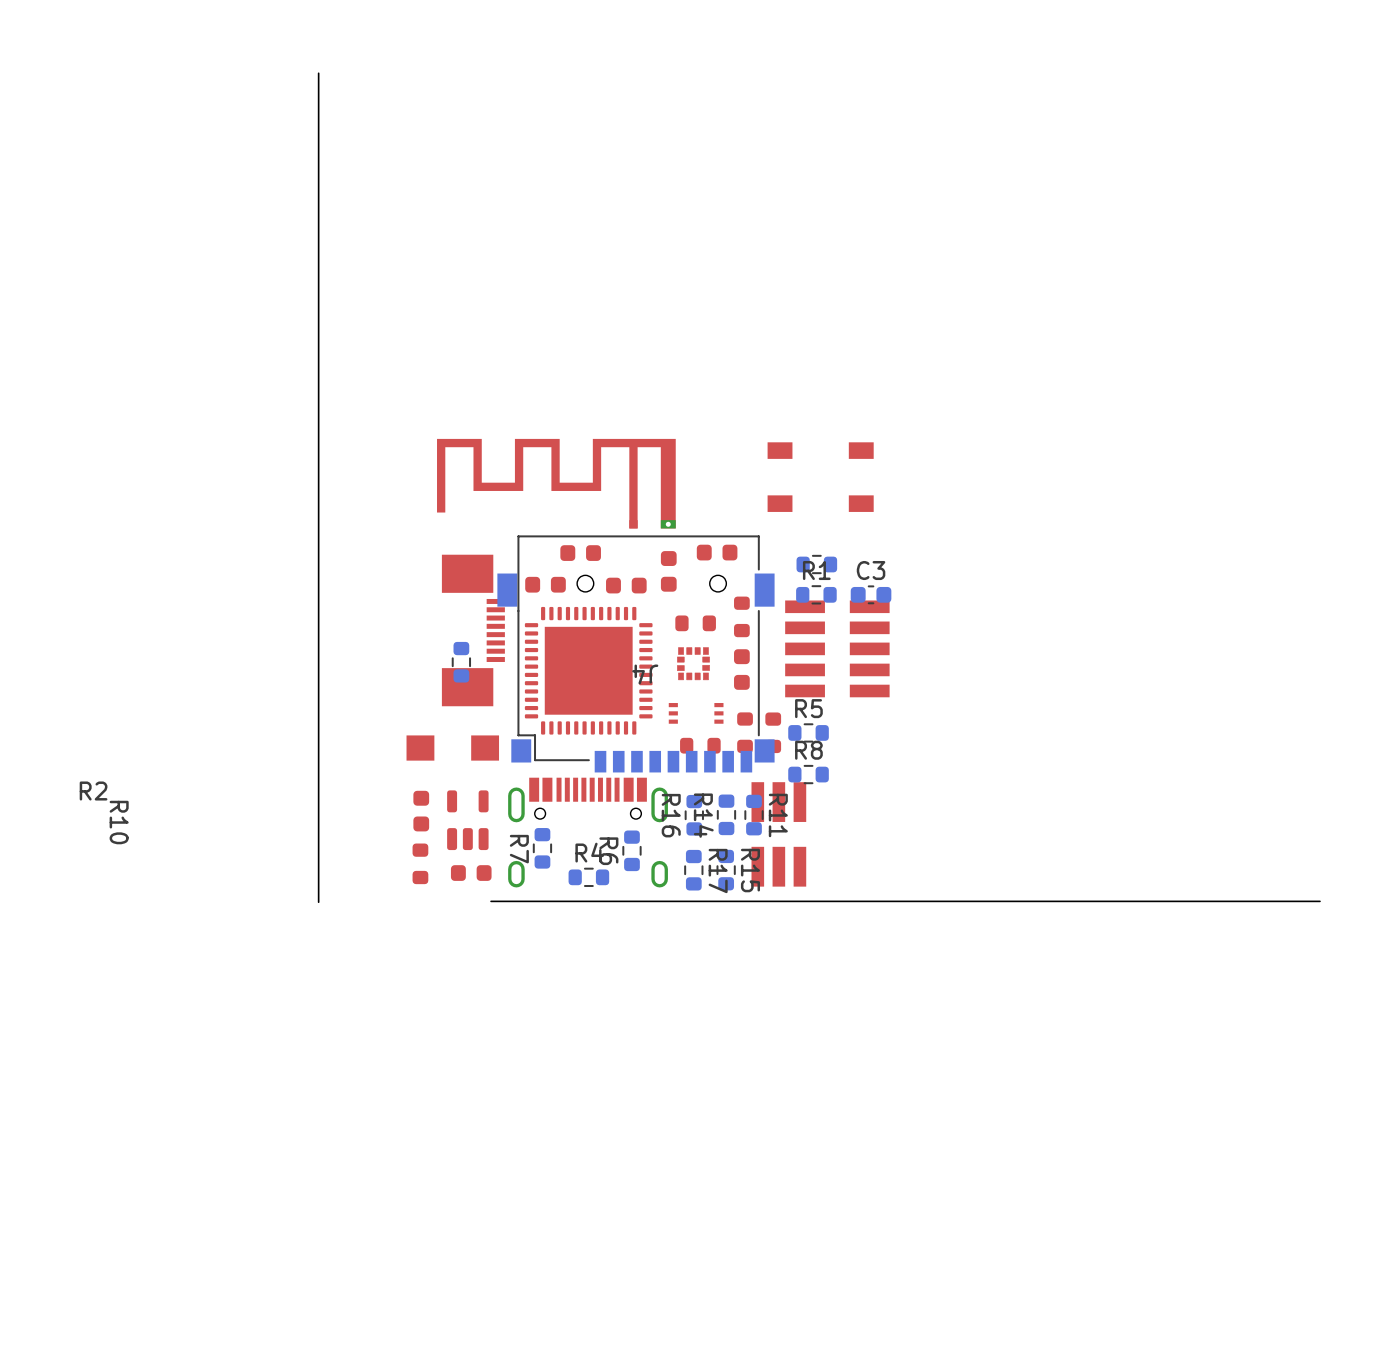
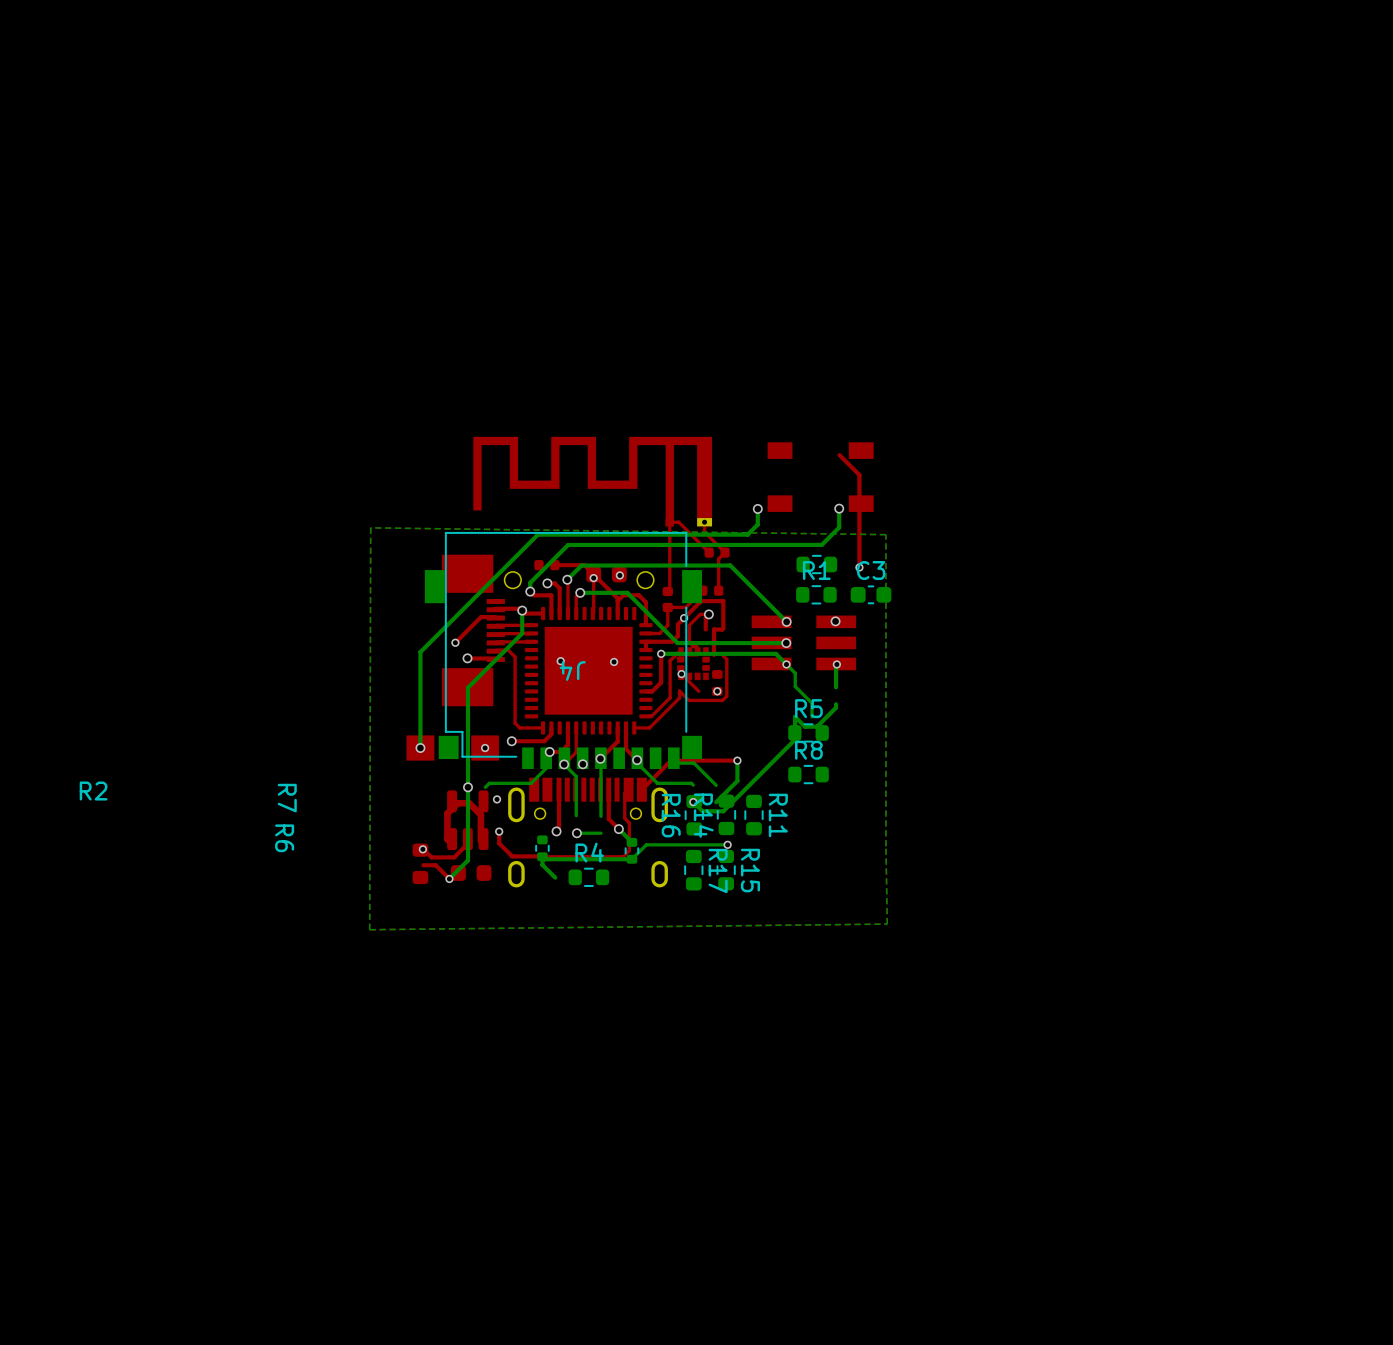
board edge: (318, 73) (318, 902) -> none
top track: none -> (839, 455) (859, 474) (859, 567)
part position: (556, 483) -> (592, 481)
bottom track: none -> (757, 508) (757, 524) (747, 534) (537, 534) (420, 652) (420, 748)
via: none -> (757, 508)
bottom track: none -> (839, 508) (839, 527) (821, 544) (568, 544) (530, 582) (530, 591)
via: none -> (839, 508)
top track: none -> (704, 522) (704, 532) (725, 552) (718, 558) (718, 590)
bottom zone outline: none -> (370, 527) (885, 534) (887, 924) (369, 929) (370, 527)
part footprint: [696, 544, 738, 561] -> [704, 547, 730, 558]
top track: none -> (709, 552) (678, 522) (669, 522) (669, 589) (667, 591)
part: (580, 553) -> none
part: none -> (546, 565)
top track: none -> (554, 565) (584, 565) (617, 598) (617, 613)
via: none -> (859, 567)
part: (668, 571) -> none
top track: none -> (593, 574) (592, 613)
part: none -> (606, 574)
via: none -> (619, 575)
via: none -> (593, 578)
top track: none -> (567, 579) (567, 613)
bottom track: none -> (567, 579) (581, 565) (730, 565) (786, 621)
via: none -> (567, 579)
top track: none -> (547, 583) (554, 583) (559, 588) (559, 613)
via: none -> (547, 583)
part: (545, 584) -> none
part: (626, 585) -> none
top track: none -> (702, 590) (686, 607) (667, 607) (667, 625) (659, 633) (645, 633)
part: none -> (710, 590)
top track: none -> (530, 591) (533, 595) (551, 595) (551, 613)
via: none -> (530, 591)
top track: none -> (580, 592) (576, 596) (576, 613)
bottom track: none -> (580, 592) (627, 592) (677, 643) (786, 643)
via: none -> (580, 592)
part: none -> (667, 599)
top track: none -> (617, 600) (623, 595) (638, 595) (645, 602) (645, 625)
top track: none -> (495, 608) (520, 608) (525, 613) (543, 613)
bottom track: none -> (522, 610) (522, 633) (468, 687) (468, 860) (449, 878)
via: none -> (522, 610)
via: none -> (708, 614)
part: (741, 616) -> none
top track: none -> (495, 617) (481, 617) (454, 643)
via: none -> (684, 618)
via: none -> (786, 621)
via: none -> (835, 621)
part: (695, 623) -> none
top track: none -> (531, 625) (495, 625)
top track: none -> (705, 629) (705, 617) (708, 614) (700, 614) (689, 625) (689, 642) (693, 646) (697, 646)
top track: none -> (714, 629) (723, 628) (723, 601) (701, 601) (677, 624) (677, 636) (672, 641) (645, 641) (645, 650)
top track: none -> (714, 629) (714, 654)
top track: none -> (531, 633) (495, 633)
top track: none -> (531, 641) (495, 641)
via: none -> (455, 642)
via: none -> (786, 643)
part: (837, 648) -> none
top track: none -> (495, 650) (508, 650) (515, 656) (515, 723) (519, 727) (543, 727)
J4 position: (635, 653) -> (563, 650)
top track: none -> (661, 653) (661, 682) (652, 691) (645, 691)
bottom track: none -> (661, 653) (775, 653) (795, 673) (795, 686) (812, 703) (812, 716)
via: none -> (661, 653)
top track: none -> (697, 654) (679, 654) (677, 653) (670, 660) (670, 697) (651, 716) (645, 716)
top track: none -> (722, 654) (726, 659) (726, 696) (722, 700) (689, 700) (679, 690) (679, 697) (649, 727) (634, 727)
via: none -> (467, 658)
top track: none -> (495, 658) (467, 658)
via: none -> (560, 661)
via: none -> (614, 661)
R10: (461, 662) -> none
via: none -> (786, 664)
bottom track: none -> (836, 664) (836, 687)
via: none -> (836, 664)
part: (741, 669) -> none
top track: none -> (679, 674) (698, 691)
via: none -> (681, 674)
part: none -> (717, 682)
via: none -> (717, 691)
bottom track: none -> (836, 704) (836, 707) (817, 726) (804, 726) (795, 716) (795, 739) (723, 811) (702, 811) (693, 802)
part: (696, 713) -> none
top track: none -> (551, 727) (551, 734) (544, 741) (511, 741)
top track: none -> (576, 727) (576, 752) (564, 764)
top track: none -> (617, 727) (617, 741) (600, 758)
top track: none -> (626, 727) (626, 749) (637, 760)
part: (745, 732) -> none
part: (773, 732) -> none
via: none -> (511, 741)
top track: none -> (567, 741) (567, 727) (567, 744) (560, 752) (549, 752)
part: (700, 745) -> none
via: none -> (420, 748)
via: none -> (485, 748)
via: none -> (549, 752)
bottom track: none -> (546, 758) (546, 768) (531, 783) (489, 783) (485, 787)
bottom track: none -> (600, 758) (600, 816)
via: none -> (600, 758)
bottom track: none -> (673, 758) (678, 763) (694, 763) (716, 785)
bottom track: none -> (637, 760) (637, 762) (657, 783) (691, 783) (693, 785)
via: none -> (637, 760)
top track: none -> (737, 760) (671, 760) (641, 789)
bottom track: none -> (737, 760) (737, 781) (716, 802)
via: none -> (737, 760)
bottom track: none -> (564, 764) (576, 776) (576, 815)
via: none -> (564, 764)
via: none -> (582, 764)
via: none -> (468, 787)
top track: none -> (559, 789) (559, 828) (556, 831)
top track: none -> (608, 789) (608, 818) (618, 829)
top track: none -> (628, 789) (624, 793) (624, 818) (629, 822) (629, 850) (623, 856) (512, 856) (499, 843) (499, 831)
via: none -> (497, 799)
via: none -> (693, 802)
part: (421, 811) -> none
R7 footprint: [532, 828, 553, 869] -> [535, 835, 550, 862]
bottom track: none -> (618, 829) (631, 842)
via: none -> (618, 829)
R6 footprint: [622, 830, 642, 872] -> [624, 837, 640, 864]
via: none -> (499, 831)
via: none -> (556, 831)
bottom track: none -> (576, 832) (600, 833)
via: none -> (576, 833)
part rotation: 0° (778, 834) -> 90° clockwise (803, 642)
part position: (778, 834) -> (803, 642)
top track: none -> (465, 841) (465, 846) (454, 857) (431, 857) (423, 849)
top track: none -> (480, 841) (480, 815) (469, 803) (457, 803) (447, 813) (447, 839) (449, 841)
bottom track: none -> (727, 844) (646, 844) (631, 859) (544, 859) (542, 856) (542, 864) (555, 877)
via: none -> (727, 844)
via: none -> (422, 849)
R7 name position: R7 (519, 849) -> R7 (287, 798)
R6 name position: R6 (608, 851) -> R6 (284, 838)
top track: none -> (423, 865) (435, 865) (449, 878)
via: none -> (449, 878)
board edge: (1319, 901) (491, 901) -> none

